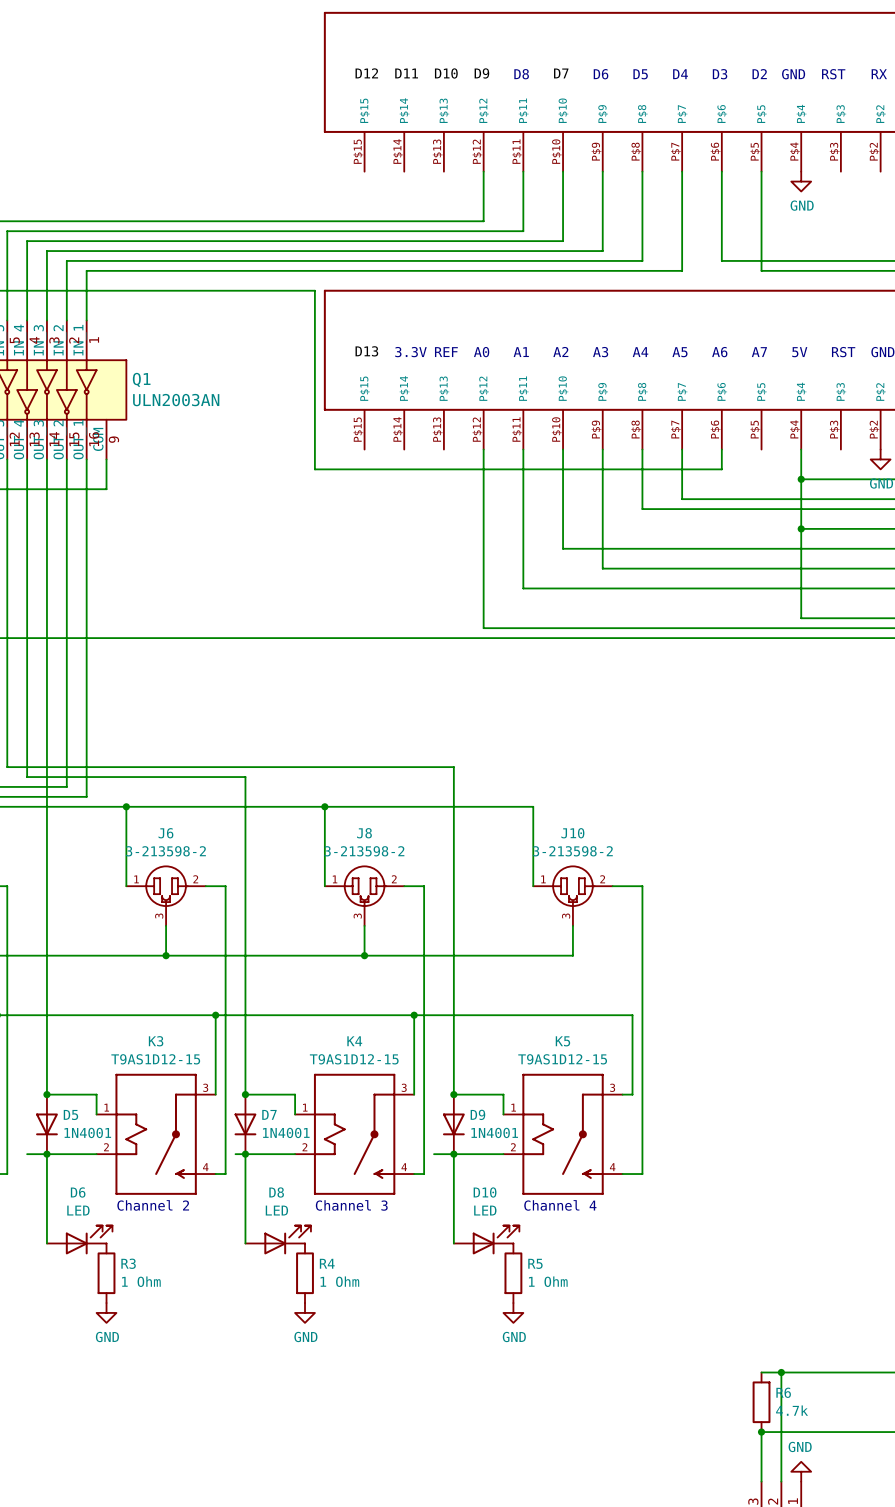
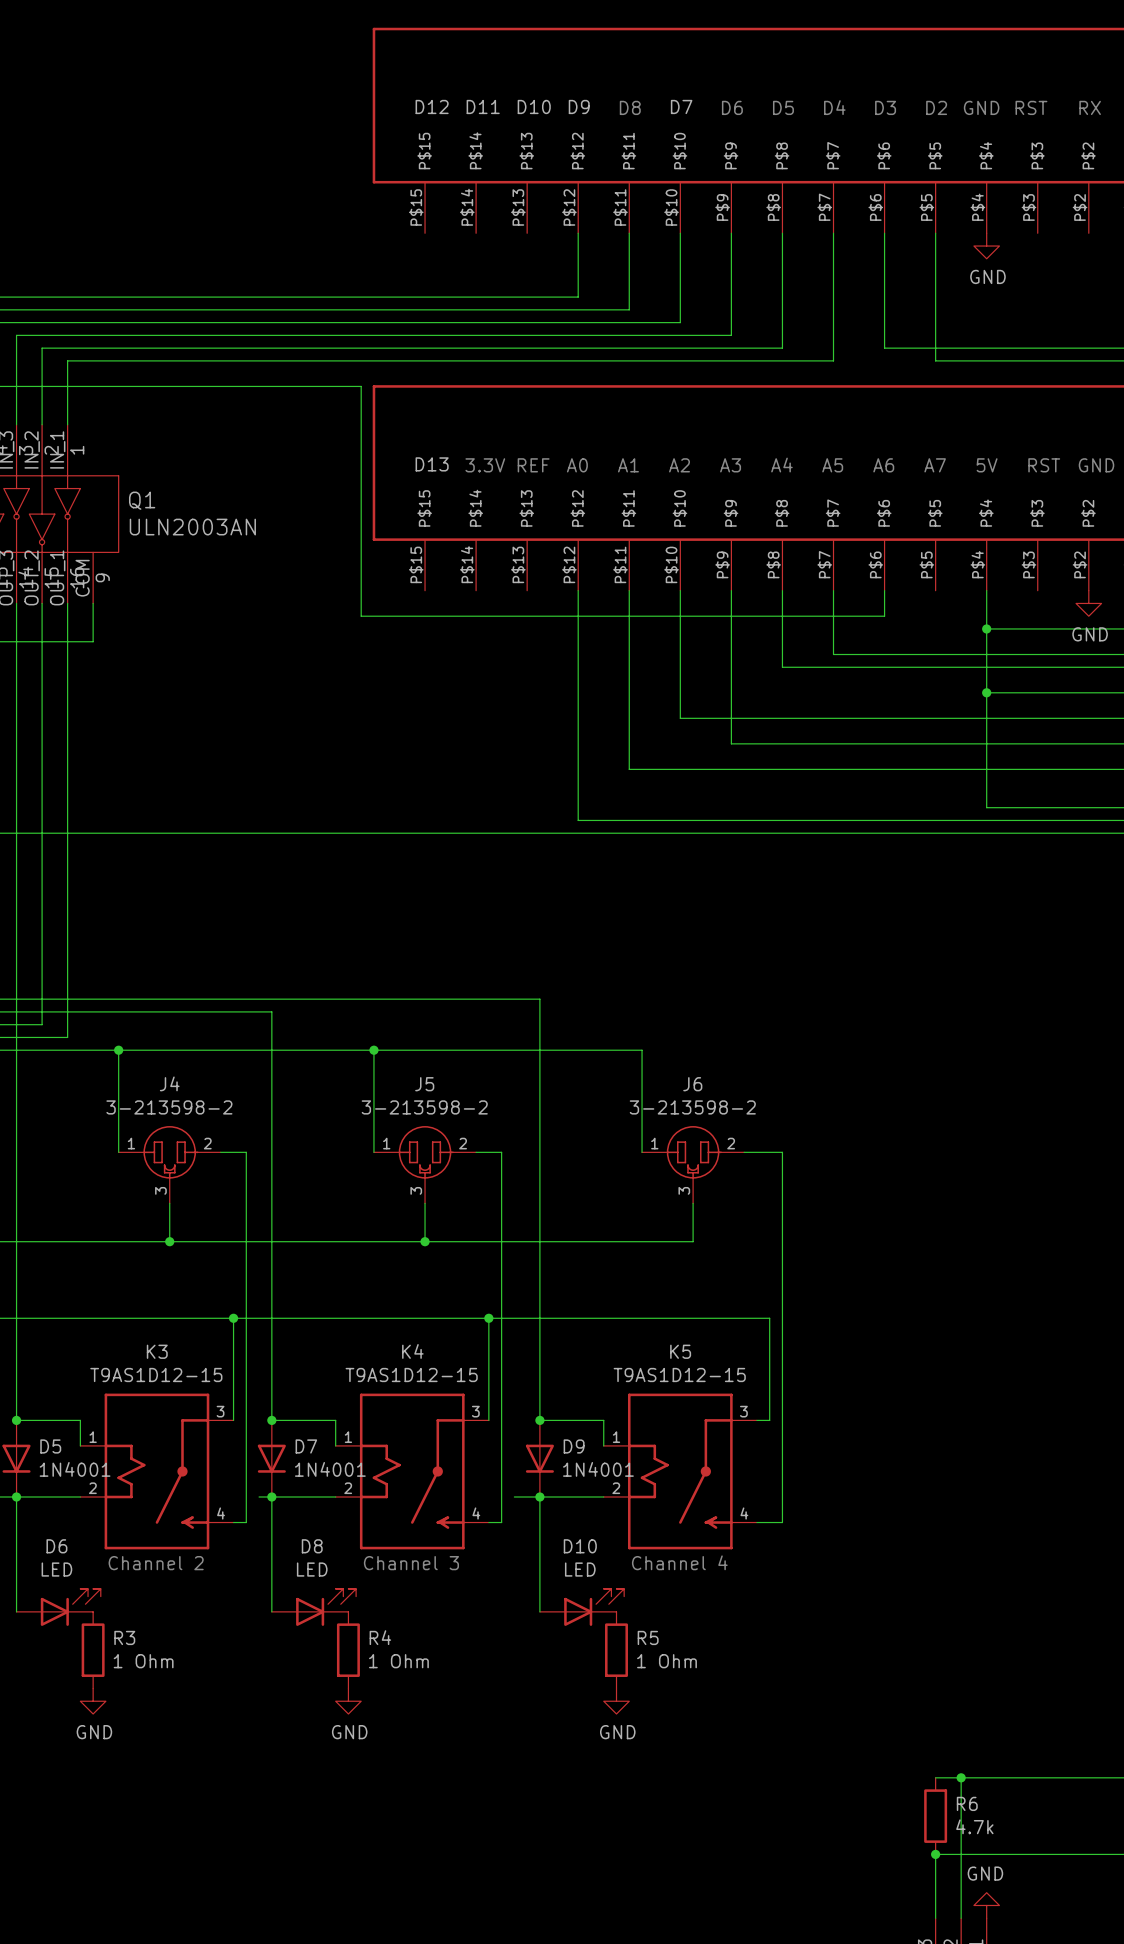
J6 name: J6 (165, 833) -> J4 (169, 1083)
J8 name: J8 (364, 833) -> J5 (424, 1084)
J10 name: J10 (572, 833) -> J6 (692, 1084)

